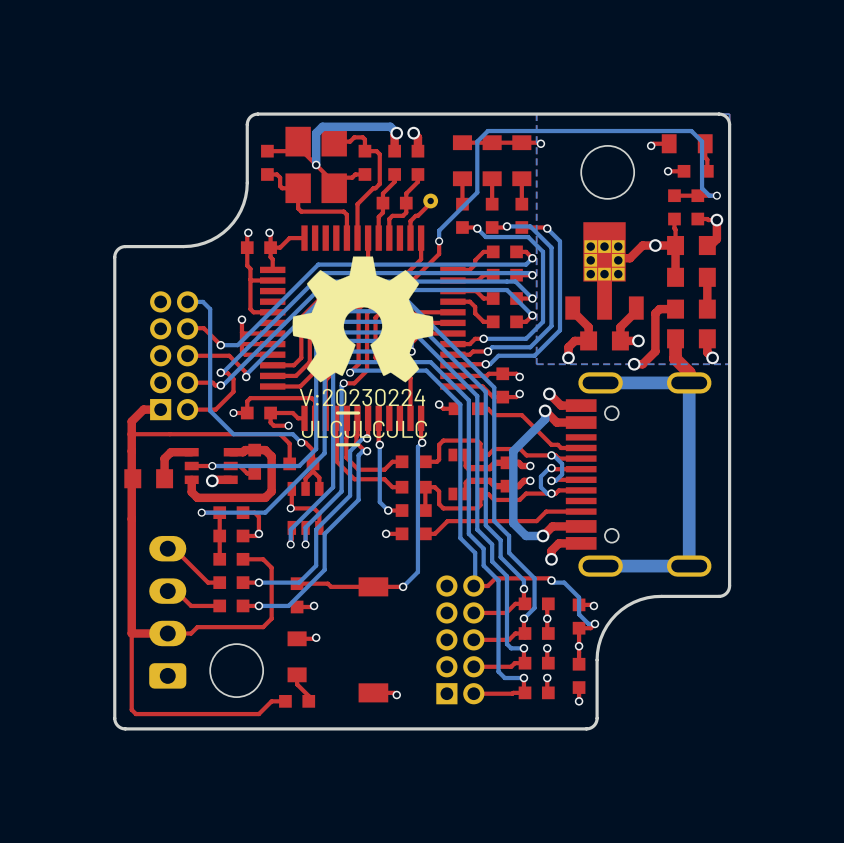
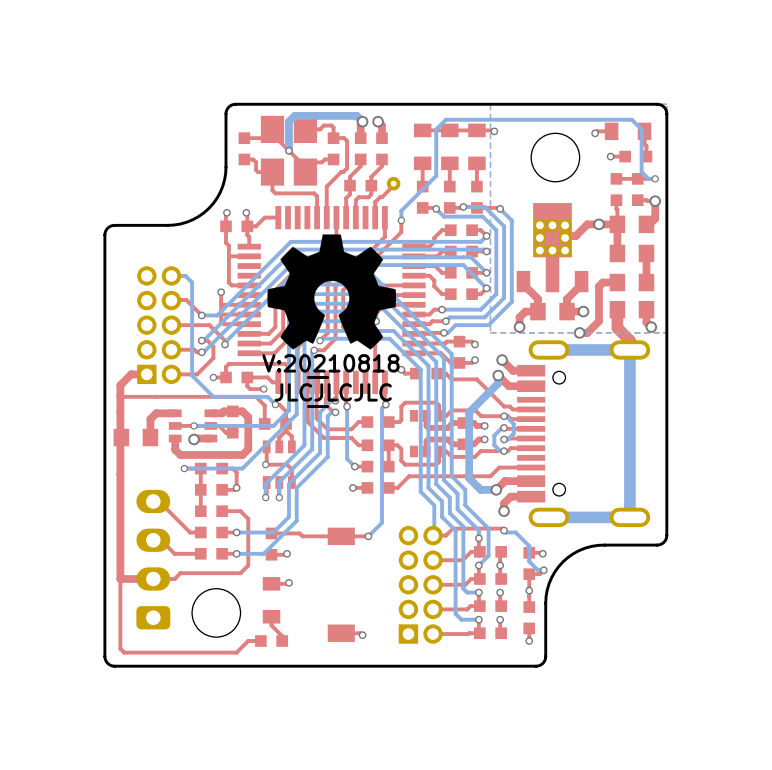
drawing shape: [299, 388, 426, 415] -> [262, 354, 400, 379]

